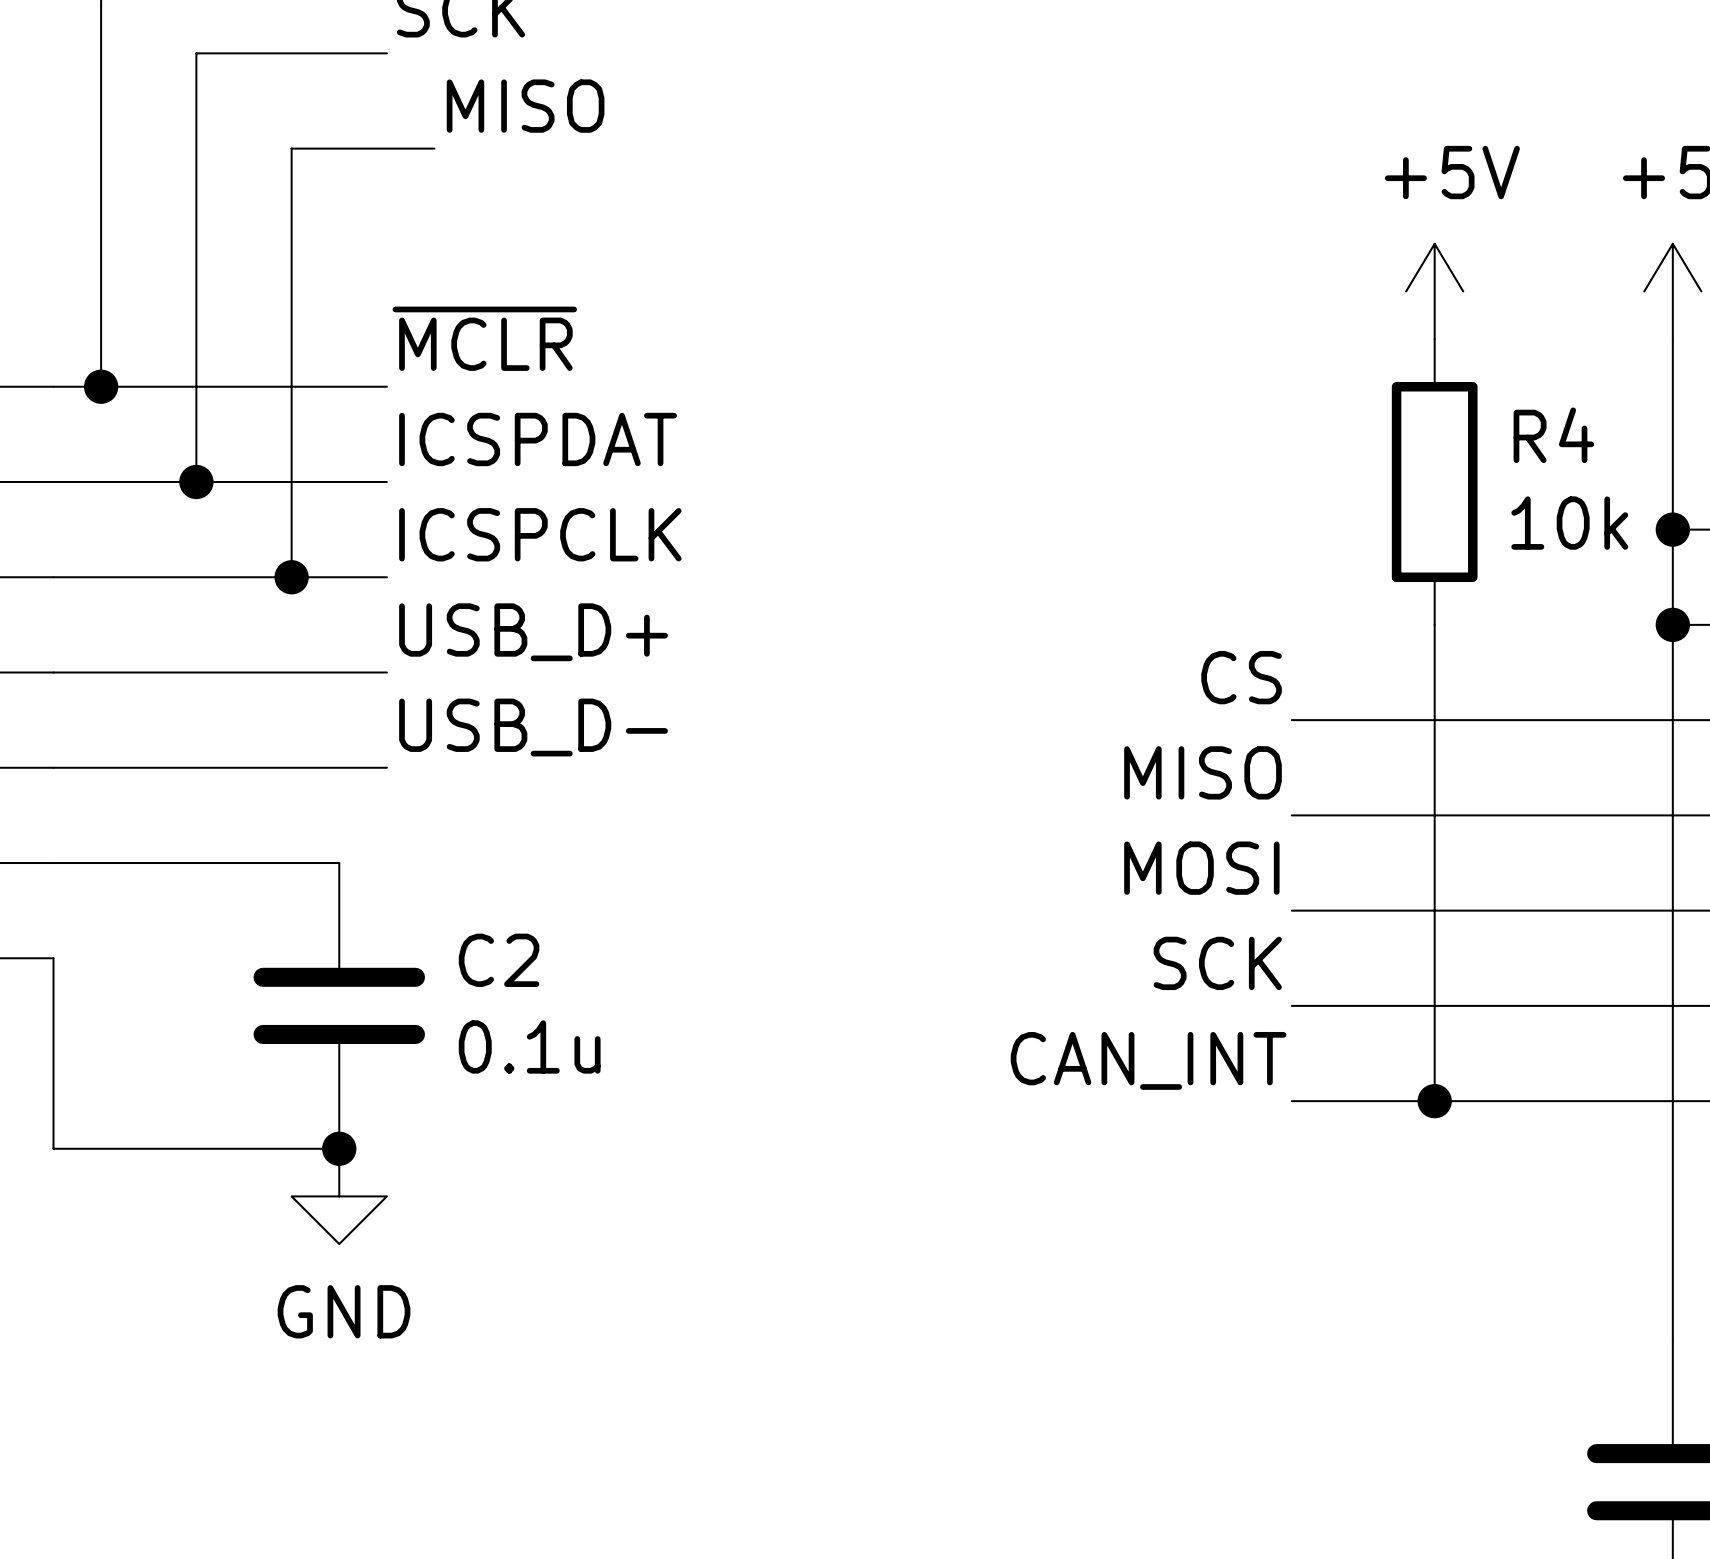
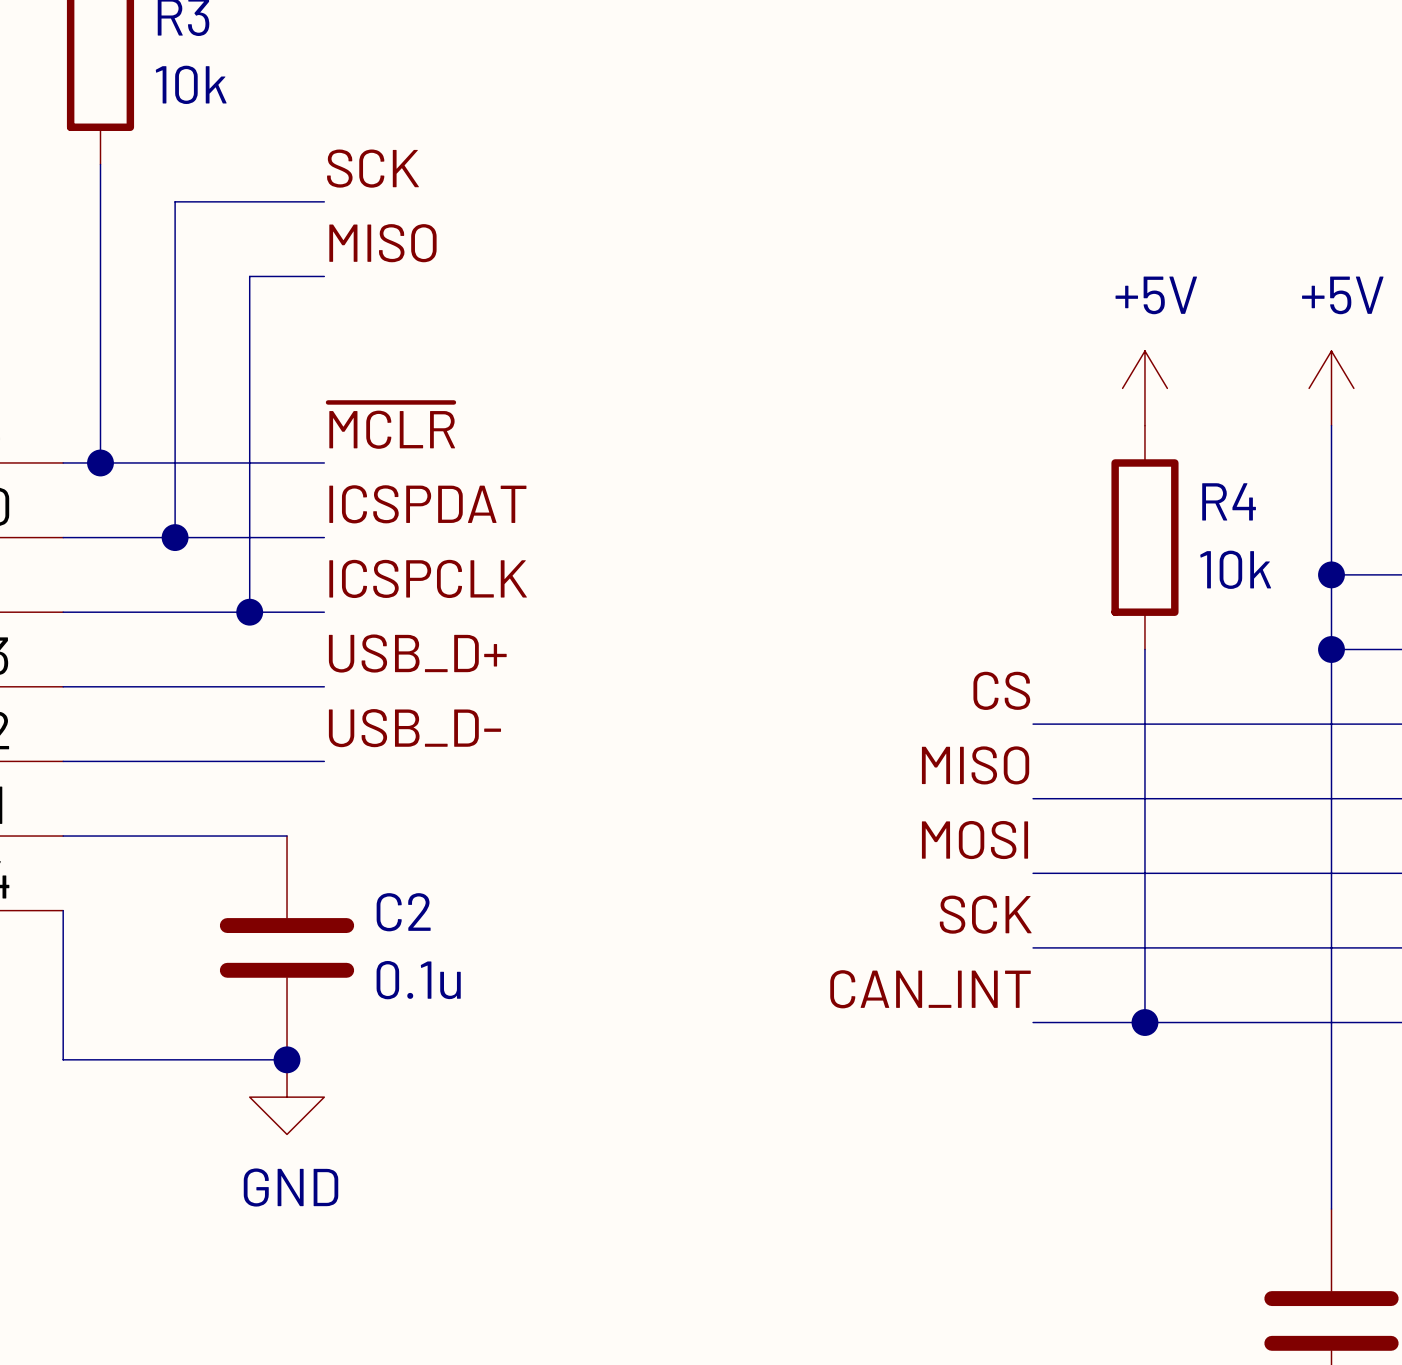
label position: MISO (525, 106) -> MISO (382, 243)
wire: (386, 148) (434, 148) -> none

